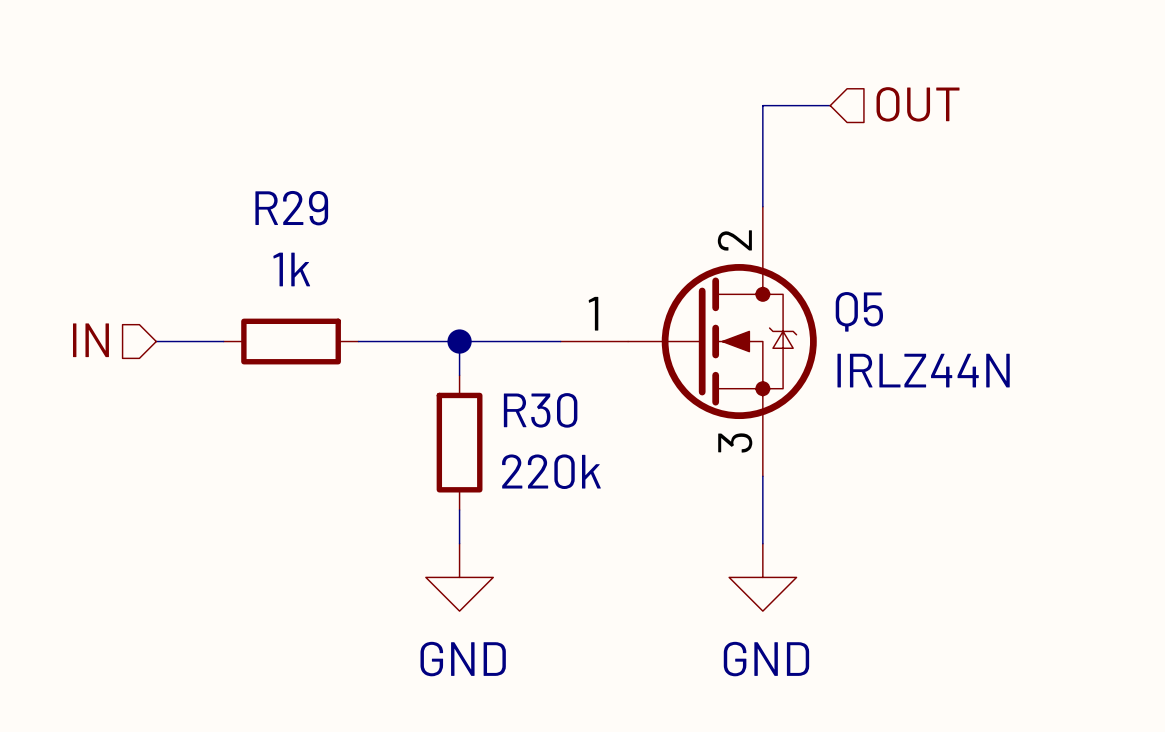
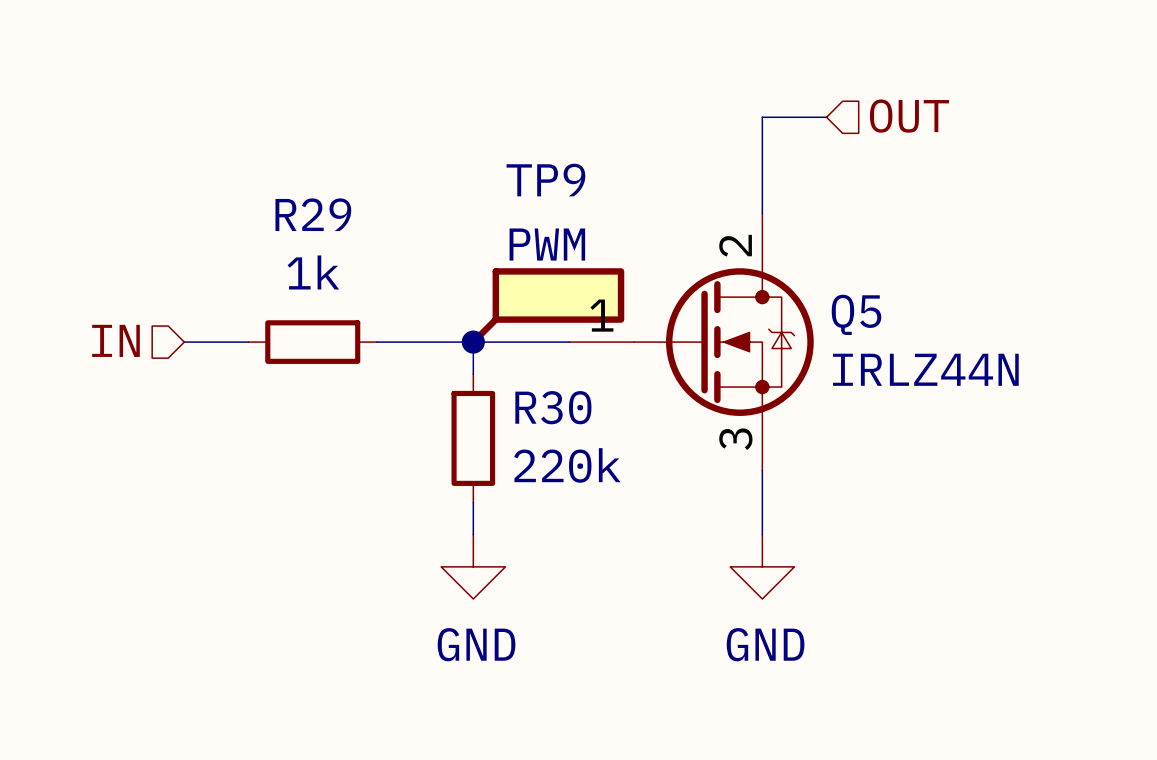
TP9: none -> PWM (547, 306)

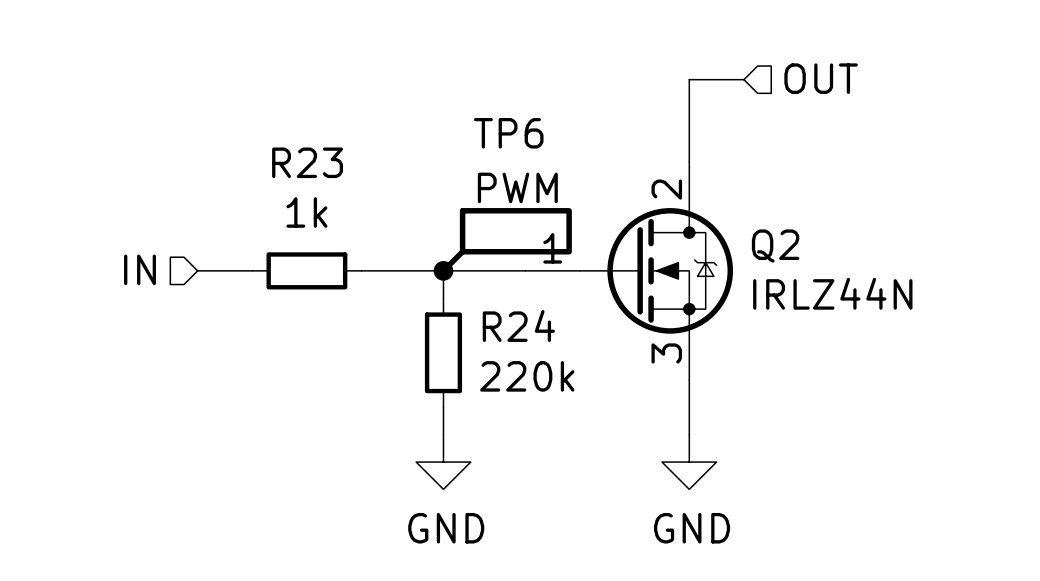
TP9 name: TP9 (545, 180) -> TP6 (508, 133)
R29 name: R29 (313, 214) -> R23 (307, 162)
Q5 name: Q5 (856, 314) -> Q2 (775, 246)
R30 name: R30 (553, 407) -> R24 (518, 326)

